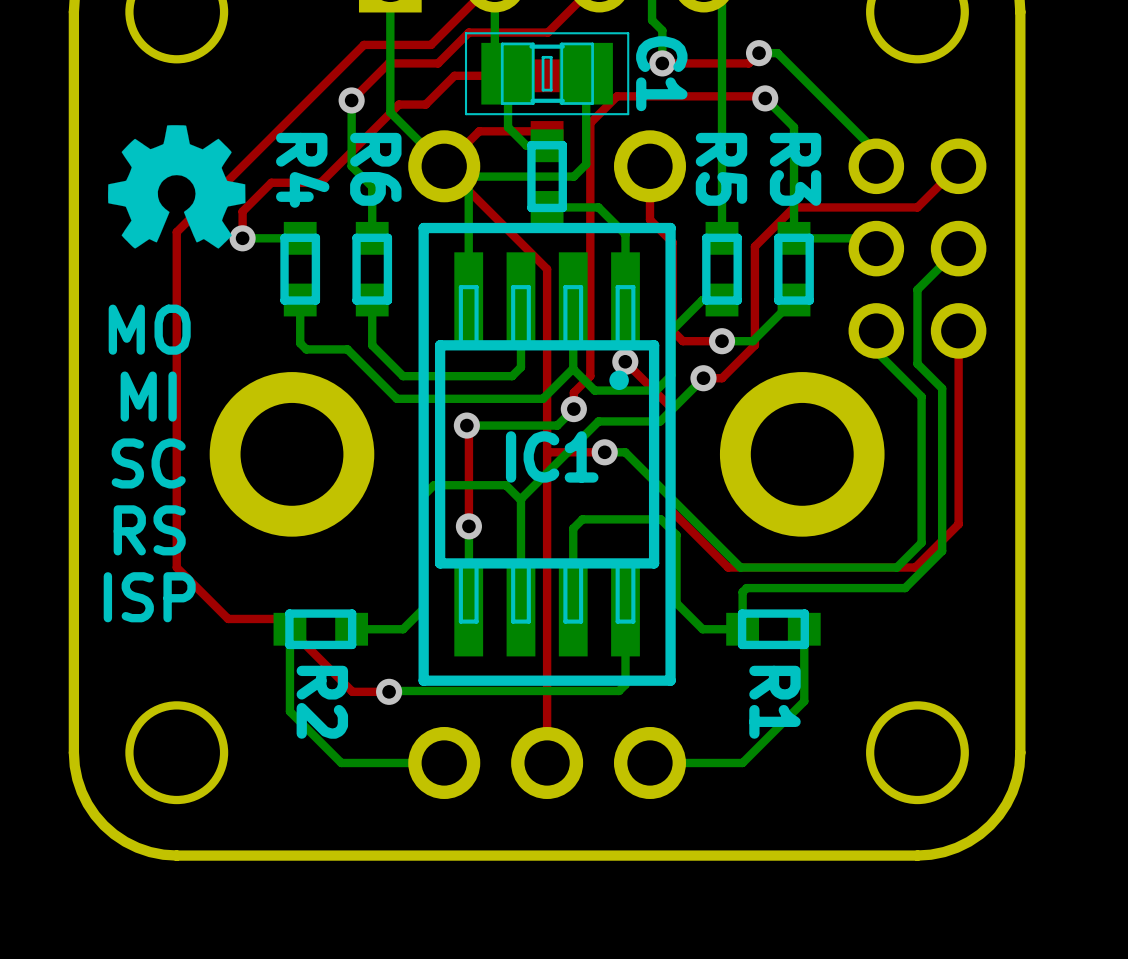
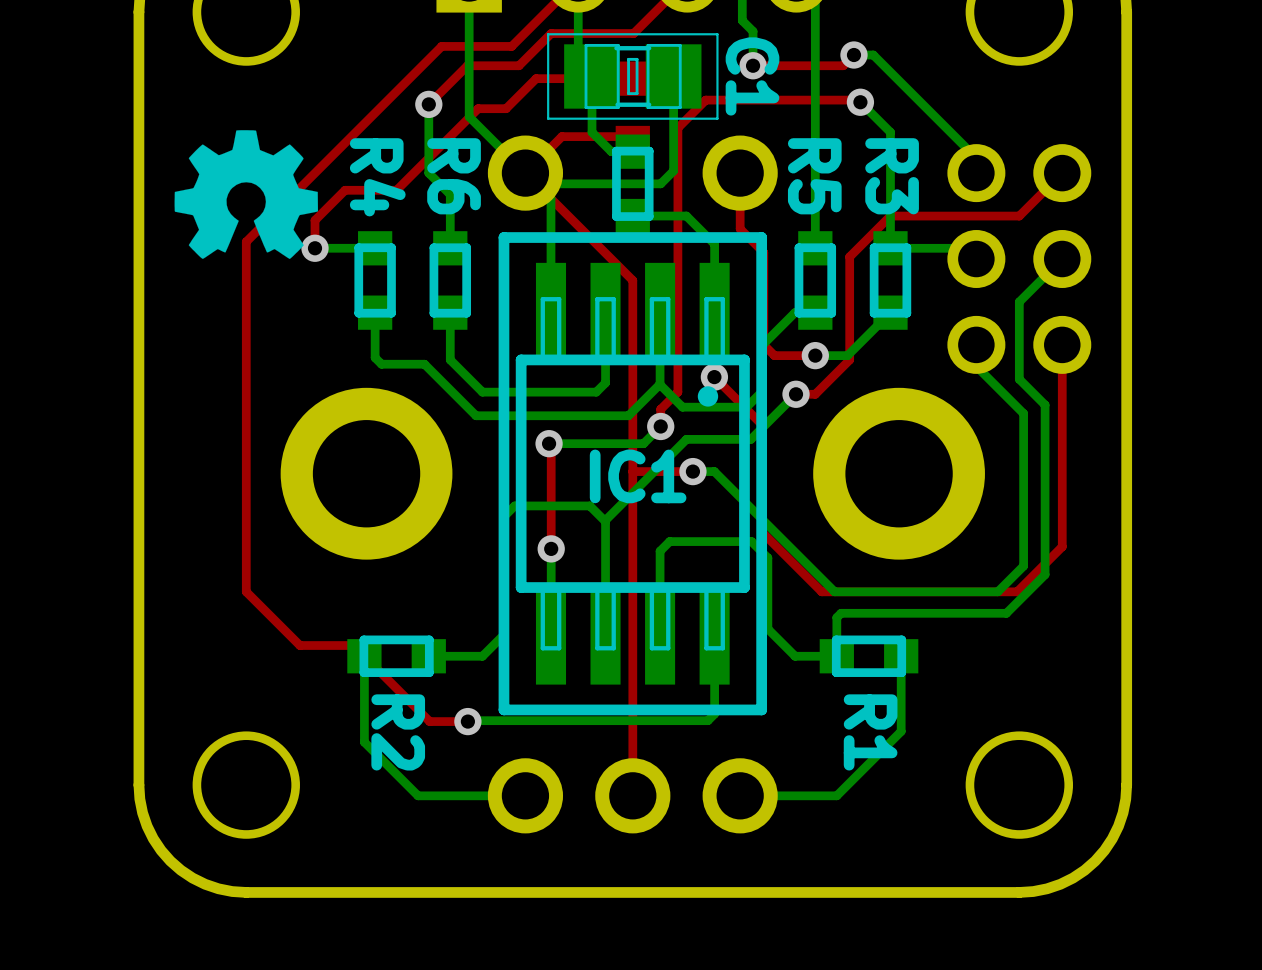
text: MO (149, 329) -> none
text: MI (148, 396) -> none
text: SC (148, 463) -> none
text: RS (149, 530) -> none
text: ISP (149, 597) -> none

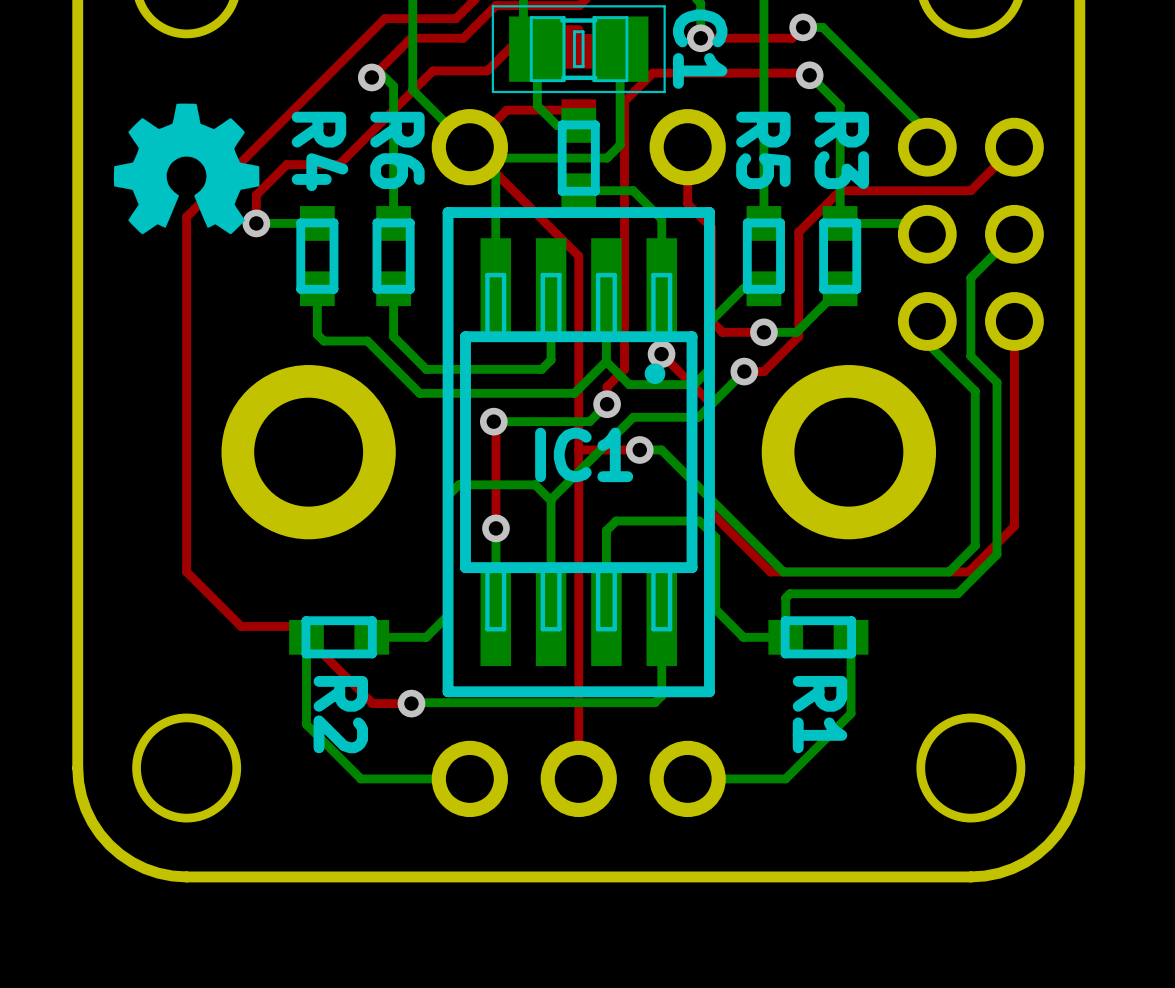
top track: (632, 78) (536, 78) (506, 108) (478, 108) -> (578, 29) (528, 29) (487, 70) (432, 70) (421, 81)
bottom track: (428, 104) (428, 173) (450, 194) -> (378, 70) (393, 86) (393, 168)

